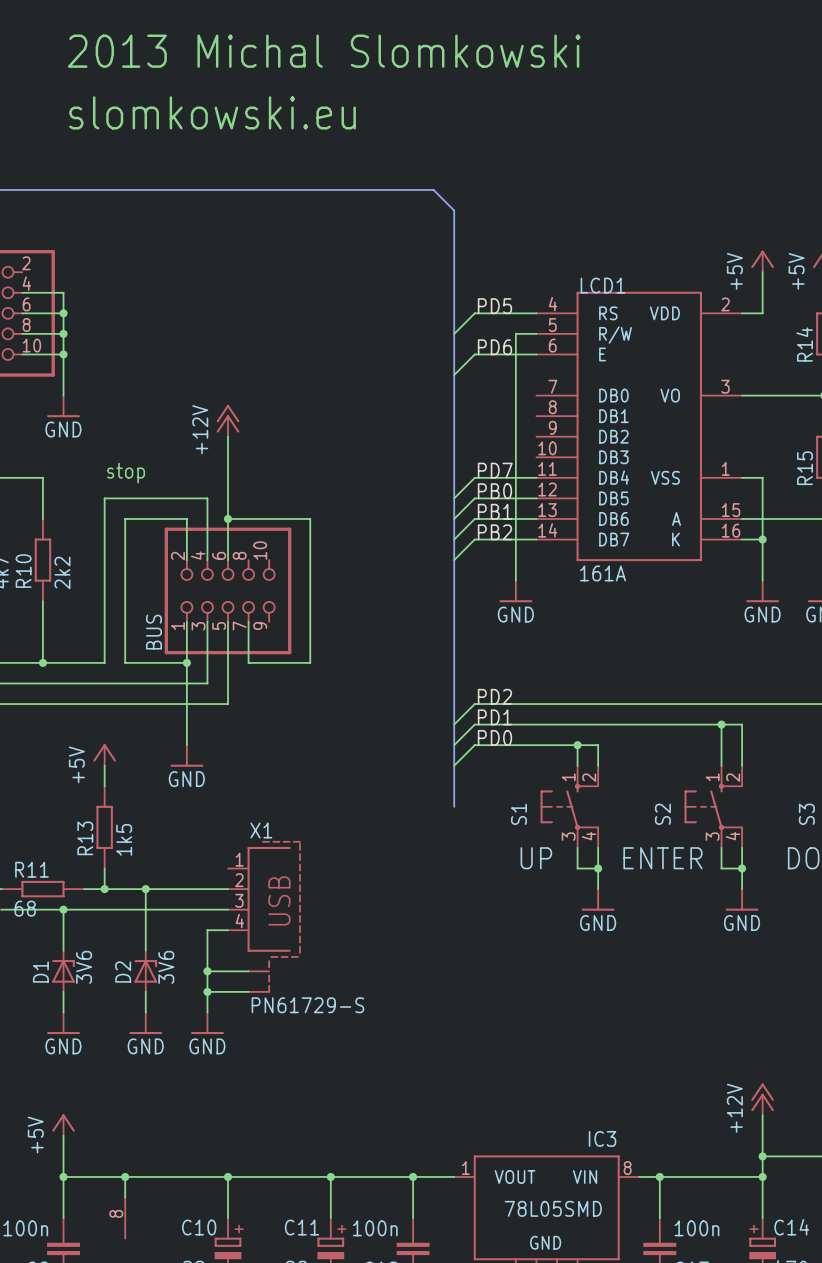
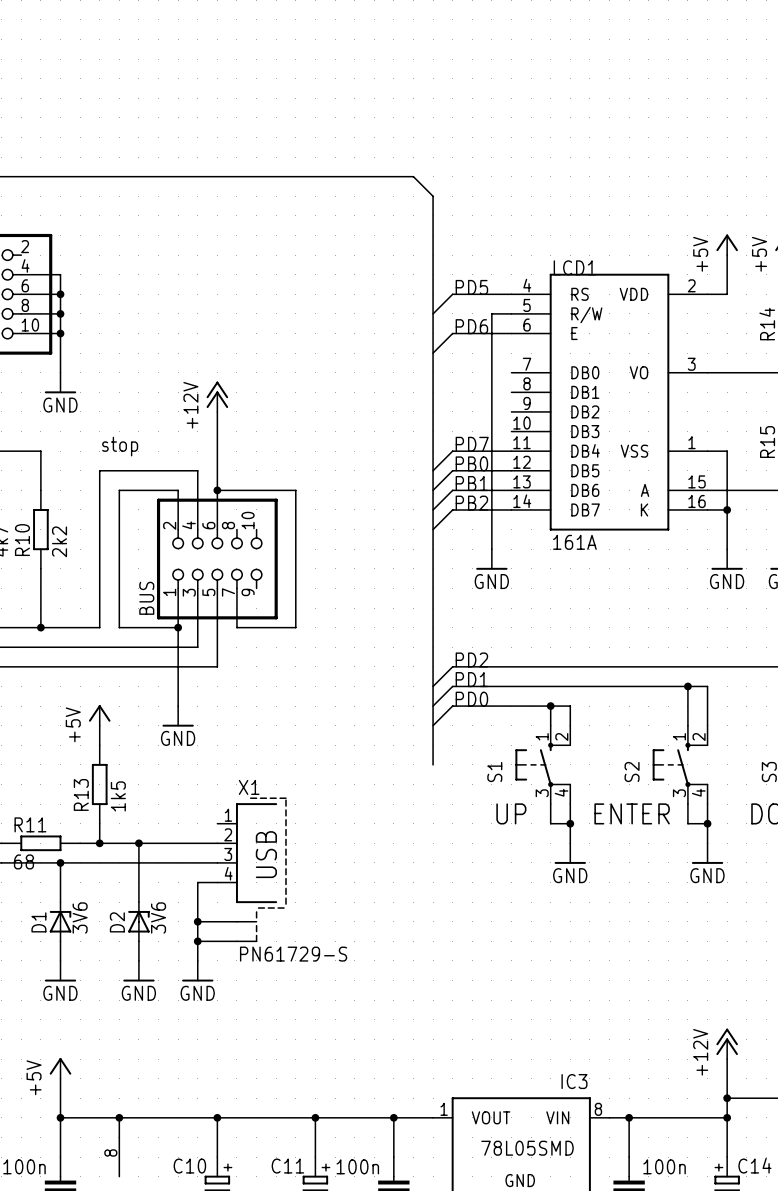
text: 2013 Michal Slomkowski (324, 51) -> none
text: slomkowski.eu (212, 112) -> none

